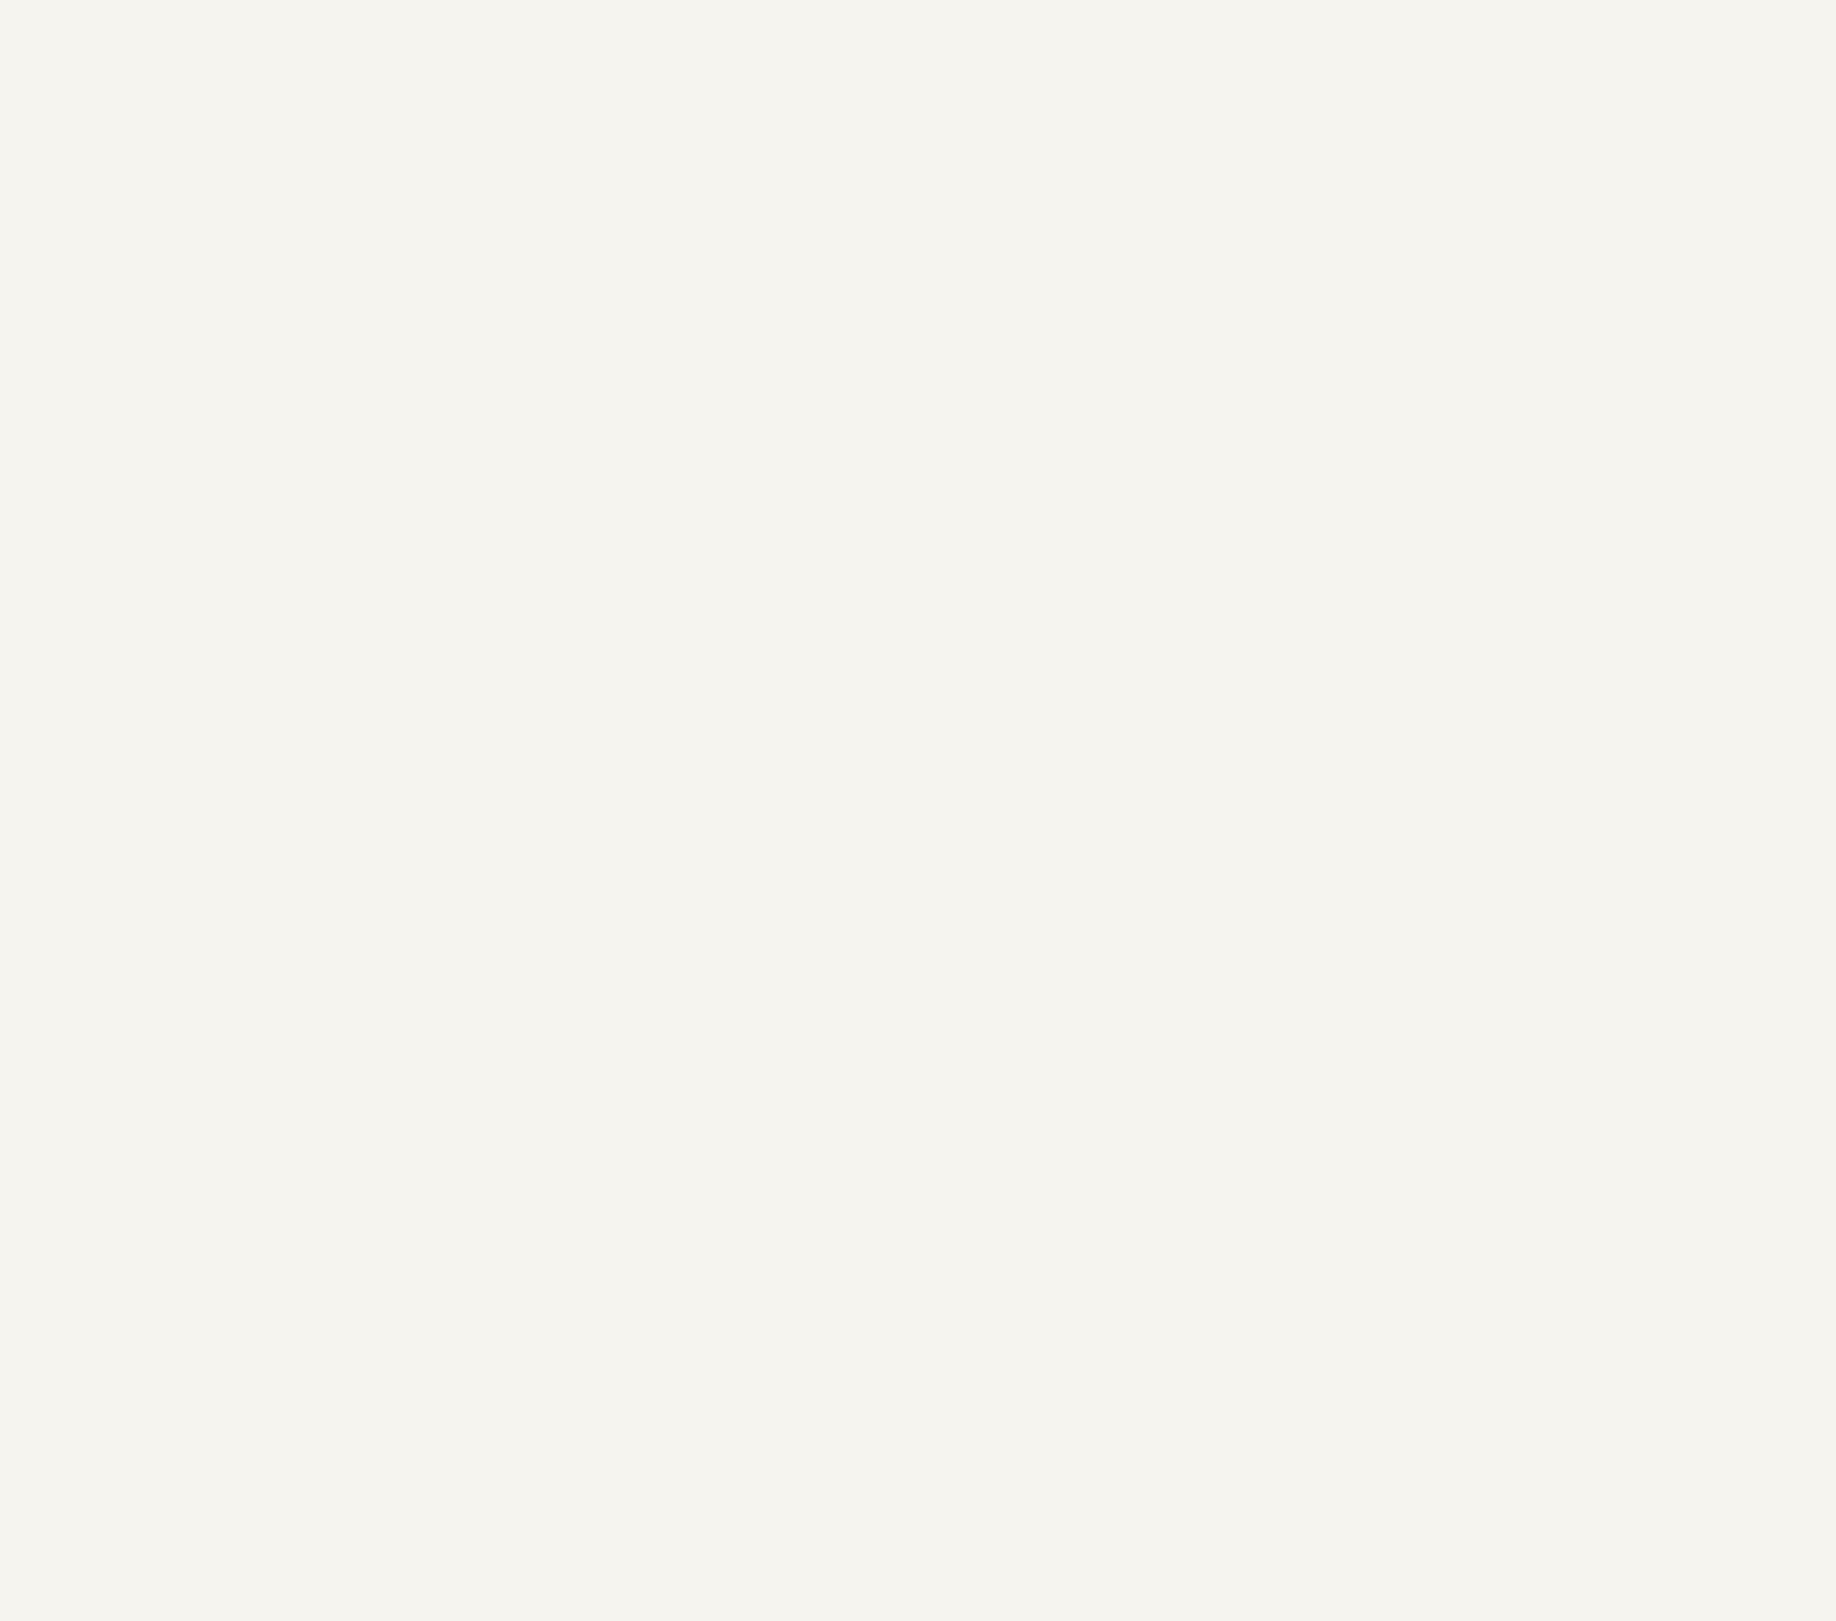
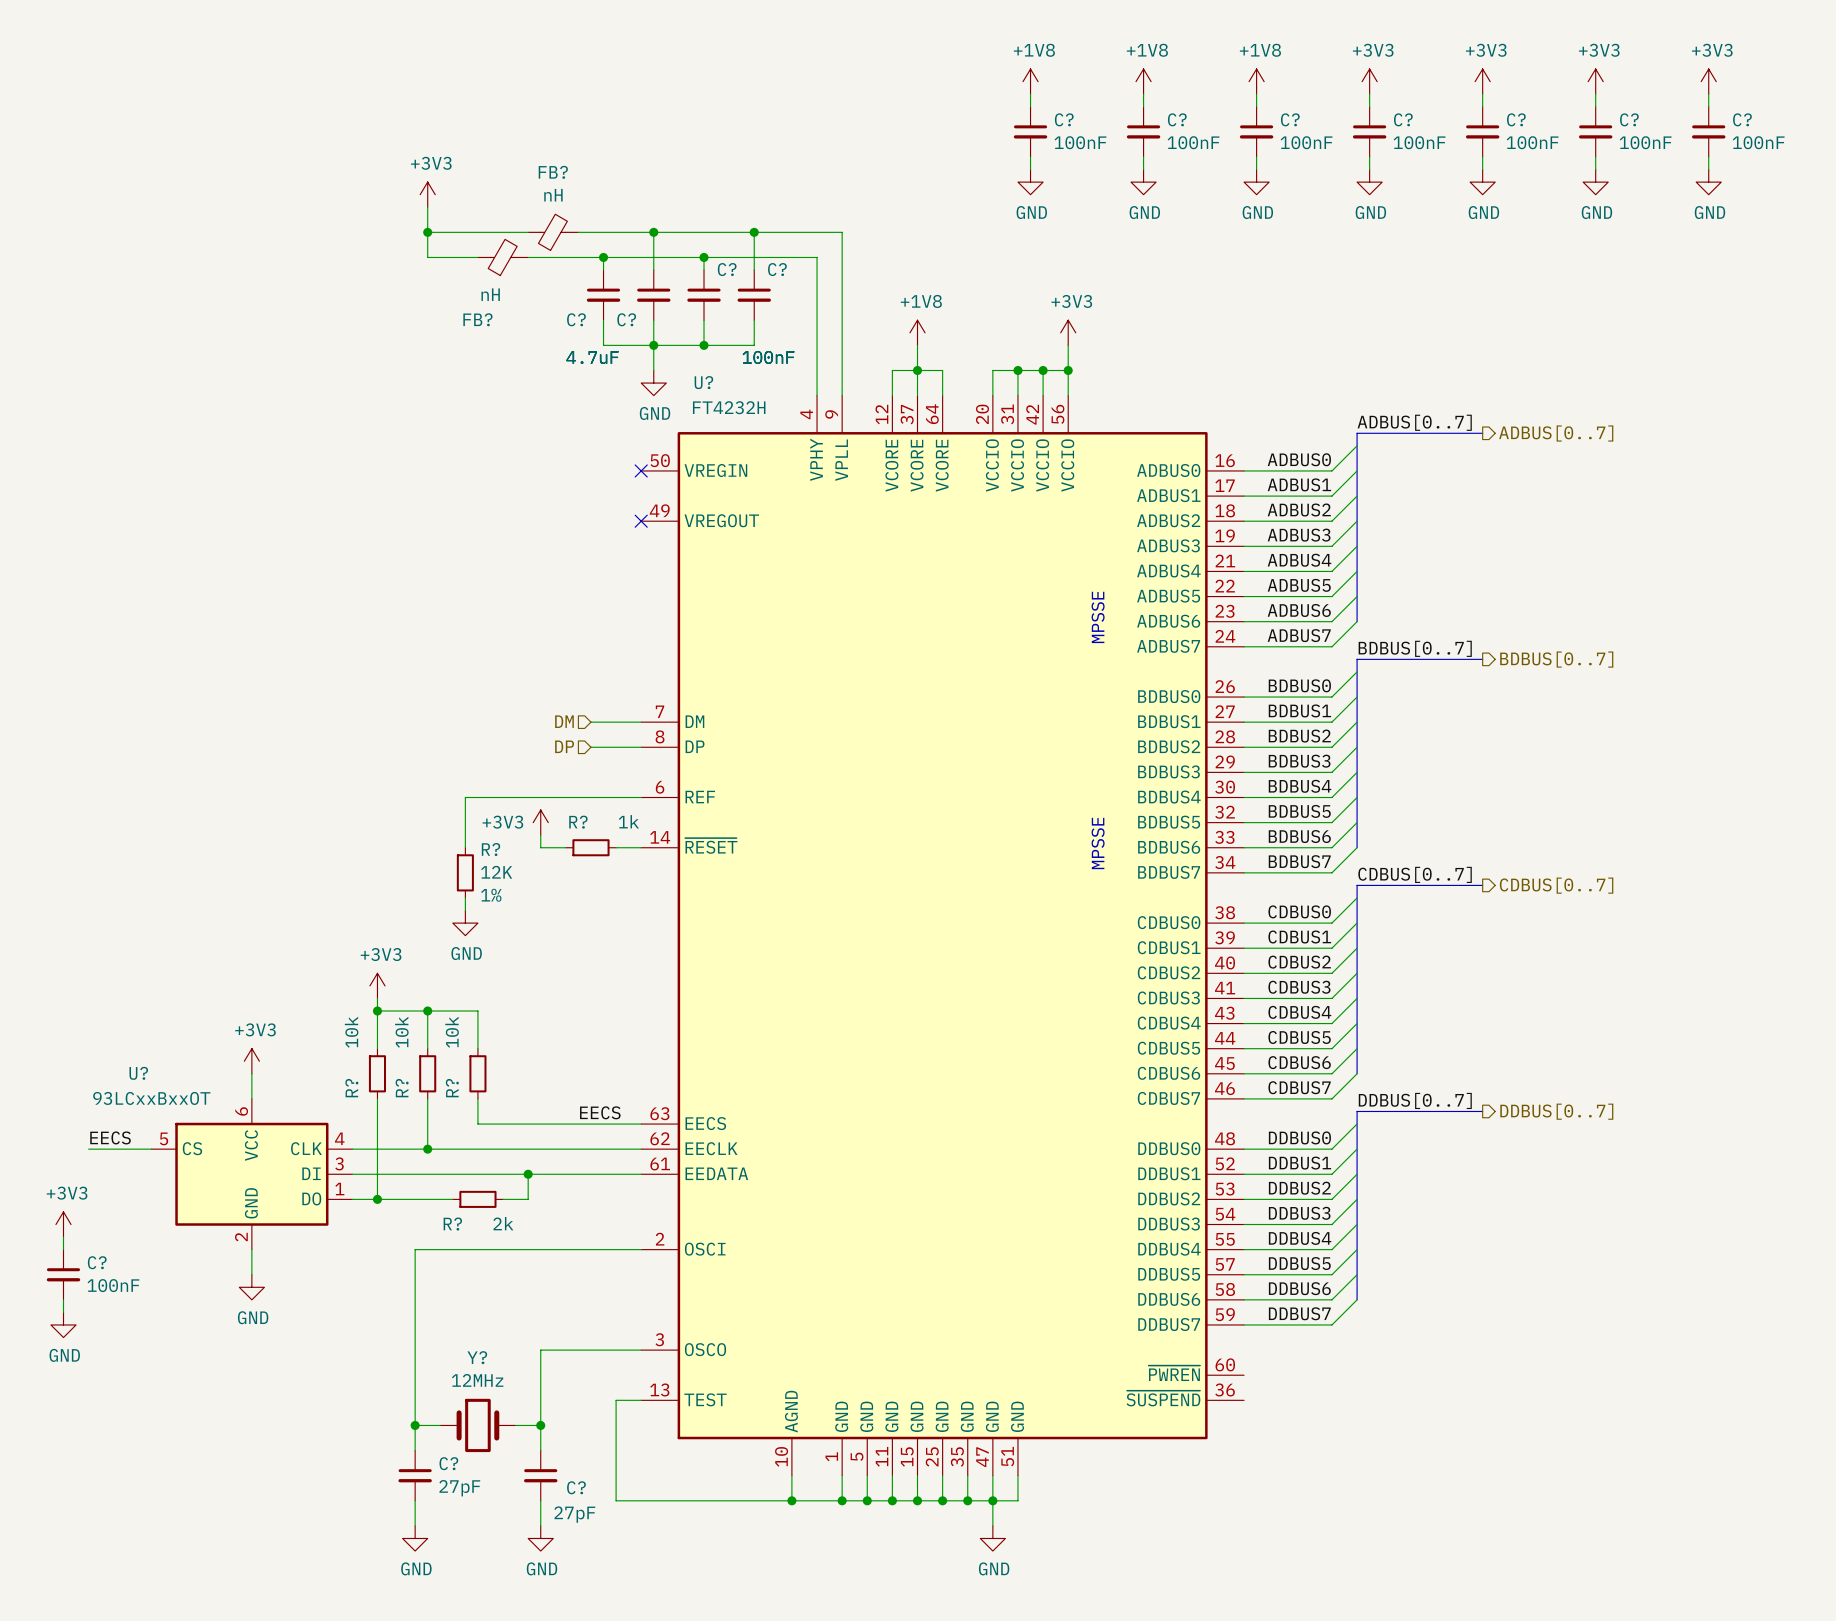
power symbol: none -> +1V8 (1030, 81)
power symbol: none -> +1V8 (1143, 81)
power symbol: none -> +1V8 (1256, 81)
power symbol: none -> +3V3 (1369, 81)
power symbol: none -> +3V3 (1482, 81)
power symbol: none -> +3V3 (1595, 81)
power symbol: none -> +3V3 (1708, 81)
wire: none -> (1030, 94) (1030, 106)
wire: none -> (1143, 94) (1143, 106)
wire: none -> (1256, 94) (1256, 106)
wire: none -> (1369, 94) (1369, 106)
wire: none -> (1482, 94) (1482, 106)
wire: none -> (1595, 94) (1595, 106)
wire: none -> (1708, 94) (1708, 106)
C?: none -> 100nF (1030, 131)
C?: none -> 100nF (1143, 131)
C?: none -> 100nF (1256, 131)
C?: none -> 100nF (1369, 131)
C?: none -> 100nF (1482, 131)
C?: none -> 100nF (1595, 131)
C?: none -> 100nF (1708, 131)
wire: none -> (1030, 156) (1030, 169)
wire: none -> (1143, 156) (1143, 169)
wire: none -> (1256, 156) (1256, 169)
wire: none -> (1369, 156) (1369, 169)
wire: none -> (1482, 156) (1482, 169)
wire: none -> (1595, 156) (1595, 169)
wire: none -> (1708, 156) (1708, 169)
power symbol: none -> GND (1030, 182)
power symbol: none -> GND (1143, 182)
power symbol: none -> GND (1256, 182)
power symbol: none -> GND (1369, 182)
power symbol: none -> GND (1482, 182)
power symbol: none -> GND (1595, 182)
power symbol: none -> GND (1708, 182)
power symbol: none -> +3V3 (427, 194)
wire: none -> (427, 207) (427, 257) (477, 257)
wire: none -> (427, 232) (528, 232)
junction: none -> (427, 232)
FB?: none -> nH (553, 232)
wire: none -> (578, 232) (842, 232) (842, 395)
wire: none -> (653, 232) (653, 270)
junction: none -> (653, 232)
wire: none -> (754, 232) (754, 270)
junction: none -> (754, 232)
FB?: none -> nH (503, 257)
wire: none -> (528, 257) (817, 257) (817, 395)
wire: none -> (603, 257) (603, 270)
junction: none -> (603, 257)
wire: none -> (704, 257) (704, 270)
junction: none -> (704, 257)
C?: none -> 4.7uF (603, 295)
C?: none -> 4.7uF (653, 295)
C?: none -> 100nF (704, 295)
C?: none -> 100nF (754, 295)
wire: none -> (603, 320) (603, 345) (754, 345) (754, 320)
wire: none -> (653, 320) (653, 370)
wire: none -> (704, 320) (704, 345)
power symbol: none -> +1V8 (917, 332)
power symbol: none -> +3V3 (1068, 332)
junction: none -> (653, 345)
junction: none -> (704, 345)
wire: none -> (917, 345) (917, 395)
wire: none -> (1068, 345) (1068, 395)
junction: none -> (917, 370)
wire: none -> (1017, 370) (1017, 395)
junction: none -> (1017, 370)
wire: none -> (1043, 370) (1043, 395)
junction: none -> (1043, 370)
wire: none -> (1068, 370) (992, 370) (992, 395)
junction: none -> (1068, 370)
power symbol: none -> GND (653, 383)
wire: none -> (892, 395) (892, 370) (942, 370) (942, 395)
label: none -> ADBUS[0..7] (1414, 422)
bus: none -> (1482, 433) (1357, 433) (1357, 621)
hierarchical label: none -> ADBUS[0..7] (1556, 433)
wire: none -> (1357, 445) (1331, 470) (1244, 470)
label: none -> ADBUS0 (1299, 459)
no-connect mark: none -> (641, 470)
wire: none -> (1357, 470) (1331, 496) (1244, 496)
label: none -> ADBUS1 (1299, 484)
wire: none -> (1357, 496) (1331, 521) (1244, 521)
label: none -> ADBUS2 (1299, 510)
no-connect mark: none -> (641, 521)
wire: none -> (1357, 521) (1331, 546) (1244, 546)
label: none -> ADBUS3 (1299, 535)
wire: none -> (1357, 546) (1331, 571) (1244, 571)
label: none -> ADBUS4 (1299, 560)
wire: none -> (1357, 571) (1331, 596) (1244, 596)
label: none -> ADBUS5 (1299, 585)
wire: none -> (1357, 596) (1331, 621) (1244, 621)
label: none -> ADBUS6 (1299, 610)
text: none -> MPSSE (1098, 617)
wire: none -> (1357, 621) (1331, 646) (1244, 646)
label: none -> ADBUS7 (1299, 635)
label: none -> BDBUS[0..7] (1415, 648)
bus: none -> (1482, 659) (1357, 659) (1357, 847)
hierarchical label: none -> BDBUS[0..7] (1556, 659)
wire: none -> (1357, 671) (1331, 697) (1244, 697)
label: none -> BDBUS0 (1299, 685)
wire: none -> (1357, 697) (1331, 722) (1244, 722)
label: none -> BDBUS1 (1299, 710)
hierarchical label: none -> DM (564, 721)
wire: none -> (590, 722) (641, 722)
wire: none -> (1357, 722) (1331, 747) (1244, 747)
label: none -> BDBUS2 (1299, 736)
hierarchical label: none -> DP (564, 746)
wire: none -> (590, 747) (641, 747)
wire: none -> (1357, 747) (1331, 772) (1244, 772)
label: none -> BDBUS3 (1299, 761)
wire: none -> (1357, 772) (1331, 797) (1244, 797)
label: none -> BDBUS4 (1300, 786)
wire: none -> (641, 797) (465, 797) (465, 847)
wire: none -> (1357, 797) (1331, 822) (1244, 822)
label: none -> BDBUS5 (1299, 811)
power symbol: none -> +3V3 (540, 822)
wire: none -> (1357, 822) (1331, 847) (1244, 847)
wire: none -> (540, 835) (540, 847) (565, 847)
label: none -> BDBUS6 (1299, 836)
text: none -> MPSSE (1098, 843)
R?: none -> 1k (590, 847)
wire: none -> (616, 847) (641, 847)
wire: none -> (1357, 847) (1331, 872) (1244, 872)
label: none -> BDBUS7 (1299, 861)
R?: none -> 12K (465, 872)
label: none -> CDBUS[0..7] (1415, 874)
bus: none -> (1482, 885) (1357, 885) (1357, 1073)
hierarchical label: none -> CDBUS[0..7] (1556, 885)
wire: none -> (465, 897) (465, 910)
wire: none -> (1357, 897) (1331, 923) (1244, 923)
label: none -> CDBUS0 (1299, 911)
power symbol: none -> GND (465, 923)
wire: none -> (1357, 923) (1331, 948) (1244, 948)
U?: none -> FT4232H (942, 935)
label: none -> CDBUS1 (1299, 937)
wire: none -> (1357, 948) (1331, 973) (1244, 973)
label: none -> CDBUS2 (1299, 962)
wire: none -> (1357, 973) (1331, 998) (1244, 998)
power symbol: none -> +3V3 (377, 985)
label: none -> CDBUS3 (1299, 987)
wire: none -> (377, 998) (377, 1048)
wire: none -> (1357, 998) (1331, 1023) (1244, 1023)
wire: none -> (377, 1011) (477, 1011) (477, 1048)
junction: none -> (377, 1011)
wire: none -> (427, 1011) (427, 1048)
junction: none -> (427, 1011)
label: none -> CDBUS4 (1299, 1012)
wire: none -> (1357, 1023) (1331, 1048) (1244, 1048)
label: none -> CDBUS5 (1299, 1037)
wire: none -> (1357, 1048) (1331, 1073) (1244, 1073)
power symbol: none -> +3V3 (251, 1061)
label: none -> CDBUS6 (1299, 1062)
wire: none -> (251, 1073) (251, 1098)
R?: none -> 10k (377, 1073)
R?: none -> 10k (427, 1073)
R?: none -> 10k (477, 1073)
wire: none -> (1357, 1073) (1331, 1098) (1244, 1098)
label: none -> CDBUS7 (1299, 1087)
wire: none -> (377, 1098) (377, 1199)
wire: none -> (427, 1098) (427, 1149)
wire: none -> (477, 1098) (477, 1124) (641, 1124)
label: none -> DDBUS[0..7] (1415, 1100)
bus: none -> (1482, 1111) (1357, 1111) (1357, 1299)
label: none -> EECS (600, 1112)
hierarchical label: none -> DDBUS[0..7] (1556, 1111)
wire: none -> (1357, 1124) (1331, 1149) (1244, 1149)
label: none -> EECS (110, 1137)
label: none -> DDBUS0 (1299, 1137)
wire: none -> (88, 1149) (151, 1149)
wire: none -> (352, 1149) (641, 1149)
junction: none -> (427, 1149)
wire: none -> (1357, 1149) (1331, 1174) (1244, 1174)
label: none -> DDBUS1 (1299, 1163)
U?: none -> 93LCxxBxxOT (251, 1174)
wire: none -> (352, 1174) (641, 1174)
wire: none -> (528, 1174) (528, 1199) (503, 1199)
junction: none -> (528, 1174)
wire: none -> (1357, 1174) (1331, 1199) (1244, 1199)
label: none -> DDBUS2 (1299, 1188)
wire: none -> (352, 1199) (452, 1199)
junction: none -> (377, 1199)
R?: none -> 2k (477, 1199)
wire: none -> (1357, 1199) (1331, 1224) (1244, 1224)
label: none -> DDBUS3 (1299, 1213)
power symbol: none -> +3V3 (63, 1224)
wire: none -> (1357, 1224) (1331, 1249) (1244, 1249)
wire: none -> (63, 1237) (63, 1249)
label: none -> DDBUS4 (1300, 1238)
wire: none -> (251, 1249) (251, 1274)
wire: none -> (641, 1249) (415, 1249) (415, 1450)
wire: none -> (1357, 1249) (1331, 1274) (1244, 1274)
label: none -> DDBUS5 (1299, 1263)
C?: none -> 100nF (63, 1274)
wire: none -> (1357, 1274) (1331, 1299) (1244, 1299)
power symbol: none -> GND (251, 1287)
label: none -> DDBUS6 (1299, 1288)
wire: none -> (63, 1299) (63, 1312)
wire: none -> (1357, 1299) (1331, 1324) (1244, 1324)
label: none -> DDBUS7 (1299, 1313)
power symbol: none -> GND (63, 1324)
wire: none -> (641, 1350) (540, 1350) (540, 1450)
wire: none -> (641, 1400) (616, 1400) (616, 1500) (1017, 1500) (1017, 1475)
wire: none -> (415, 1425) (440, 1425)
junction: none -> (415, 1425)
Y?: none -> 12MHz (477, 1425)
wire: none -> (515, 1425) (540, 1425)
junction: none -> (540, 1425)
C?: none -> 27pF (415, 1475)
C?: none -> 27pF (540, 1475)
wire: none -> (791, 1475) (791, 1500)
wire: none -> (842, 1475) (842, 1500)
wire: none -> (867, 1475) (867, 1500)
wire: none -> (892, 1475) (892, 1500)
wire: none -> (917, 1475) (917, 1500)
wire: none -> (942, 1475) (942, 1500)
wire: none -> (967, 1475) (967, 1500)
wire: none -> (992, 1475) (992, 1525)
wire: none -> (415, 1500) (415, 1525)
wire: none -> (540, 1500) (540, 1525)
junction: none -> (791, 1500)
junction: none -> (842, 1500)
junction: none -> (867, 1500)
junction: none -> (892, 1500)
junction: none -> (917, 1500)
junction: none -> (942, 1500)
junction: none -> (967, 1500)
junction: none -> (992, 1500)
power symbol: none -> GND (415, 1538)
power symbol: none -> GND (540, 1538)
power symbol: none -> GND (992, 1538)

